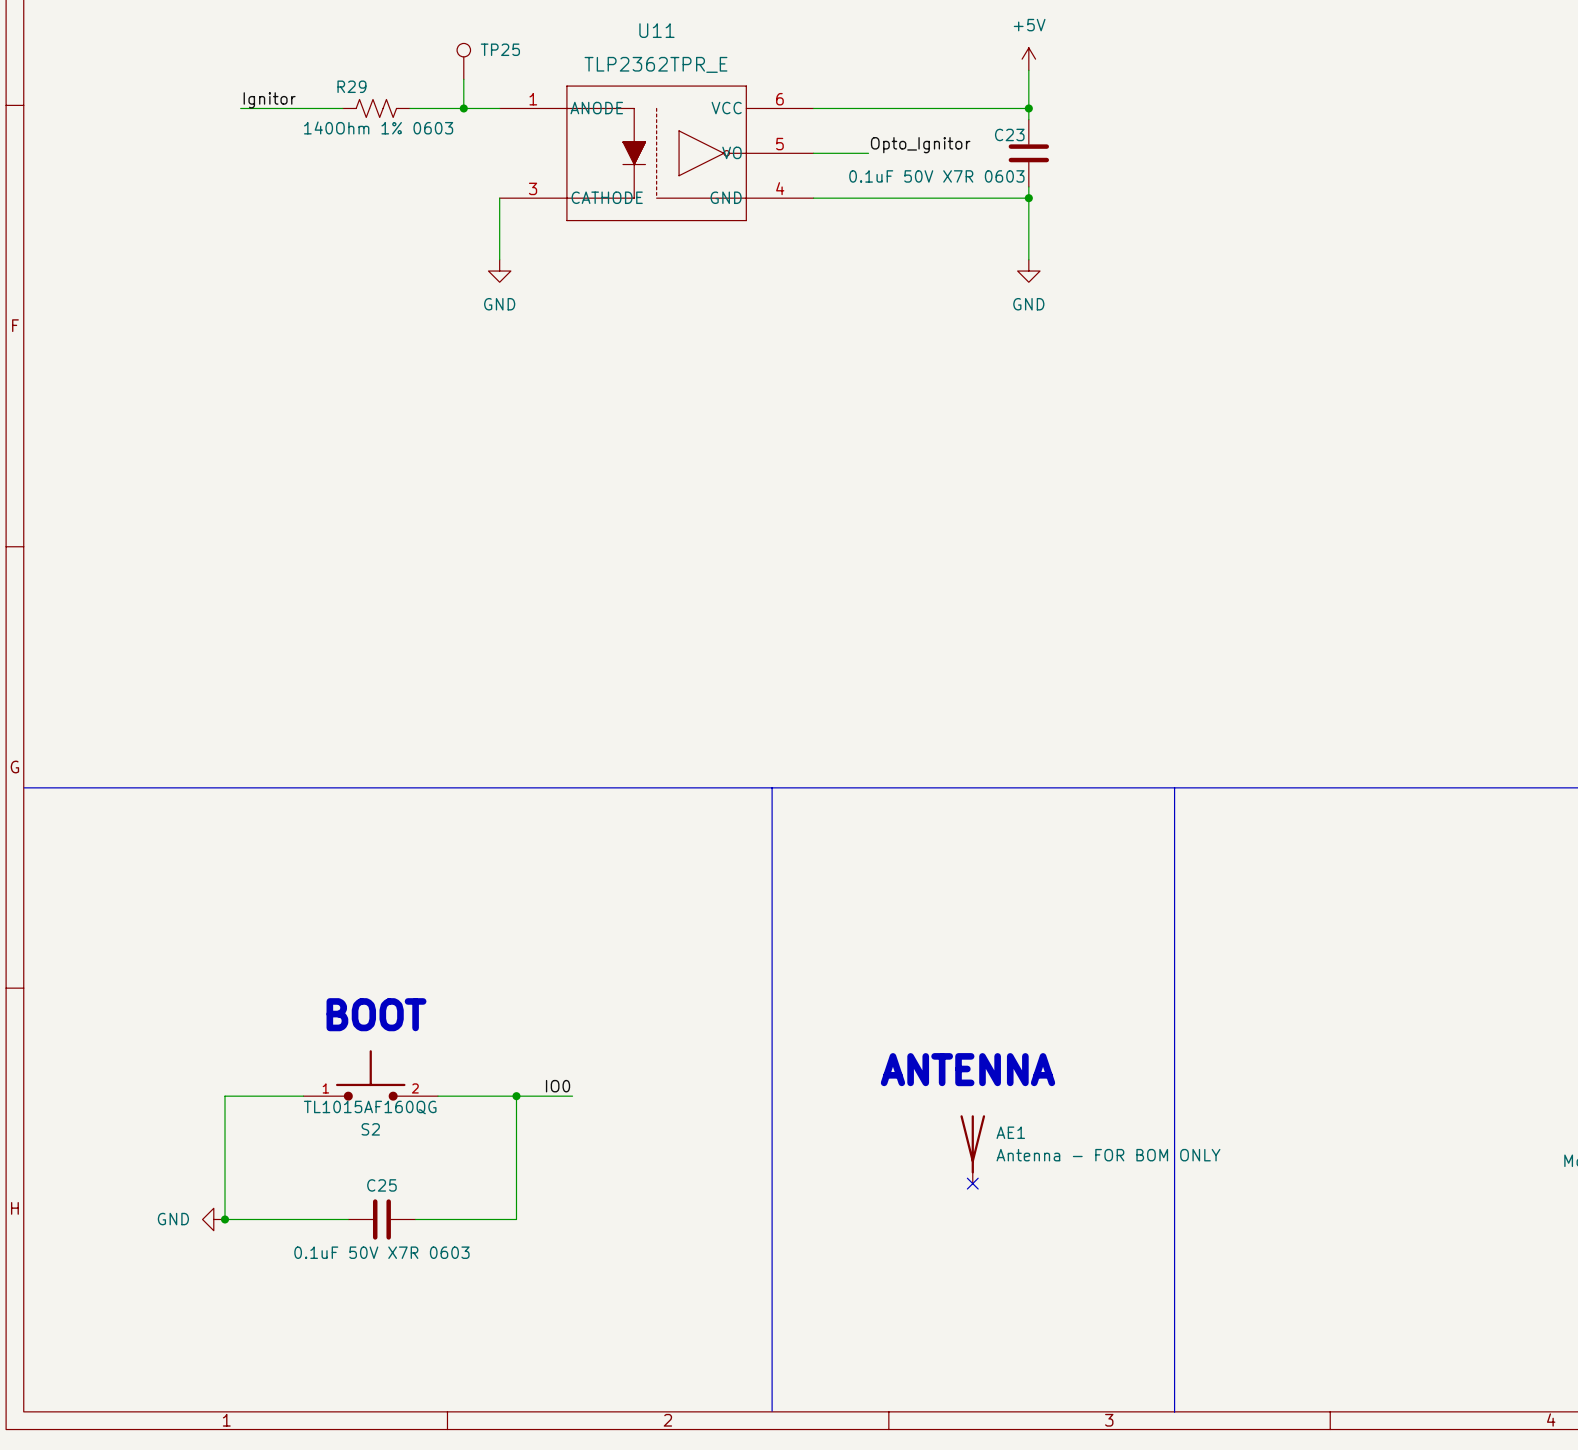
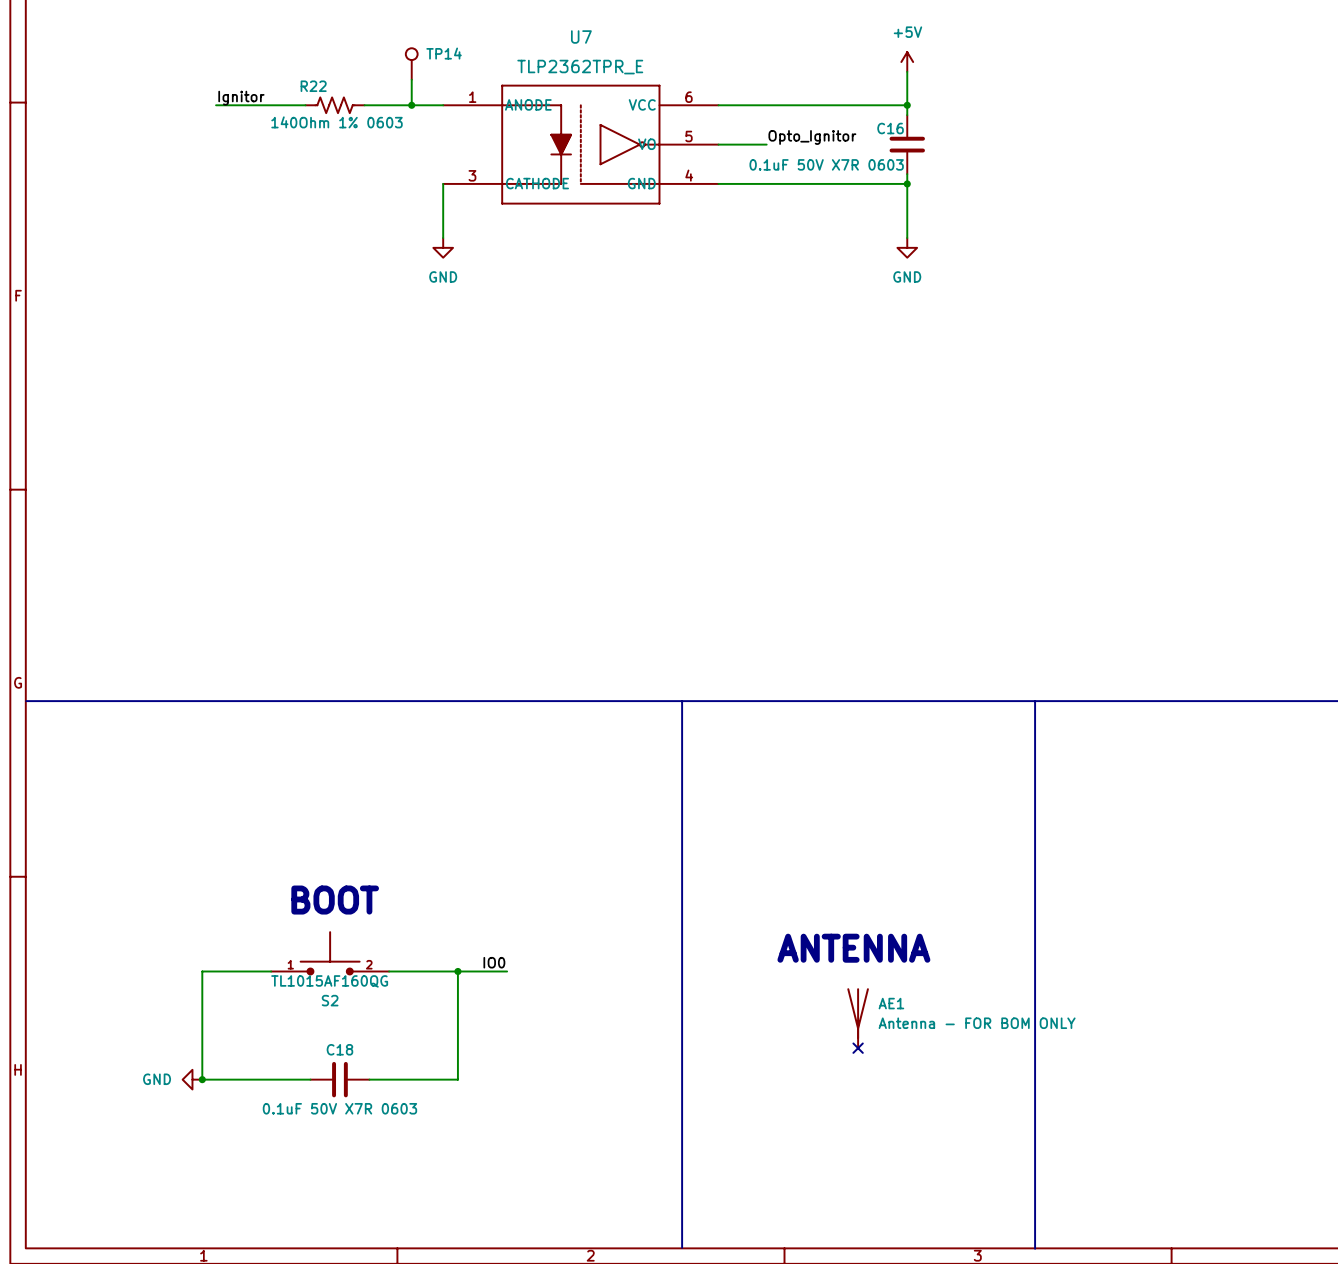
U11 name: U11 (656, 30) -> U7 (581, 37)
TP25 name: TP25 (500, 49) -> TP14 (444, 53)
R29 name: R29 (351, 86) -> R22 (313, 86)
C23 name: C23 (1009, 134) -> C16 (890, 128)
C25 name: C25 (381, 1185) -> C18 (339, 1049)

